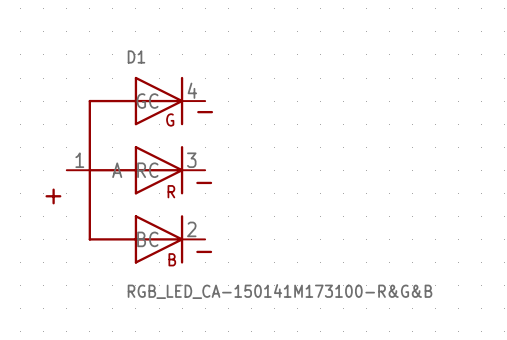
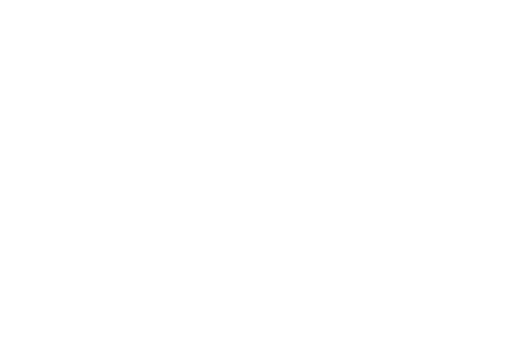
D1: RGB_LED_CA-150141M173100-R&G&B (129, 170) -> none

